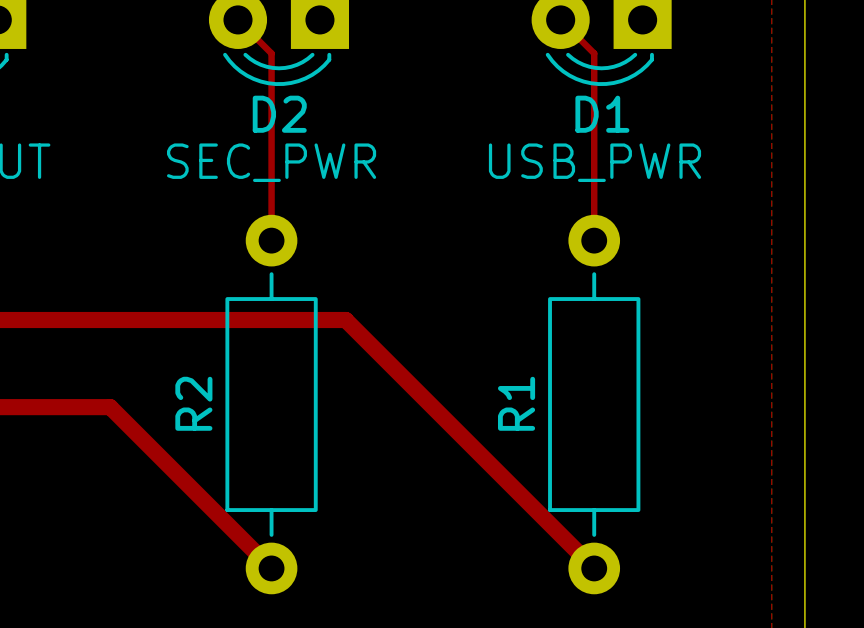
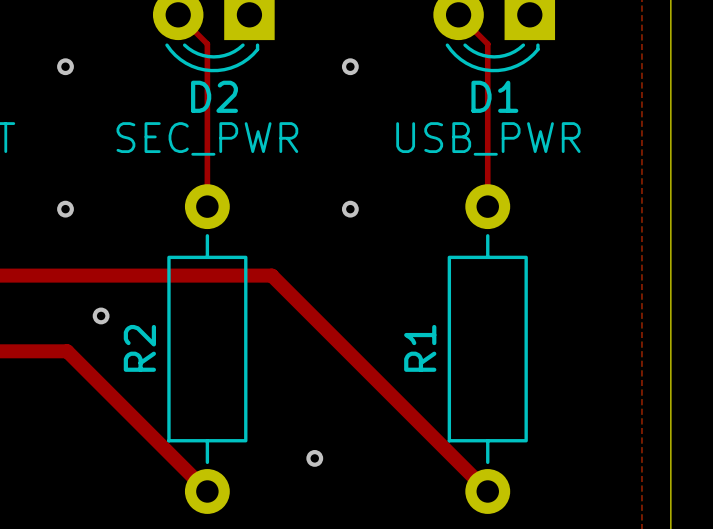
via: none -> (65, 66)
via: none -> (350, 66)
via: none -> (65, 209)
via: none -> (350, 209)
via: none -> (101, 315)
via: none -> (314, 458)

